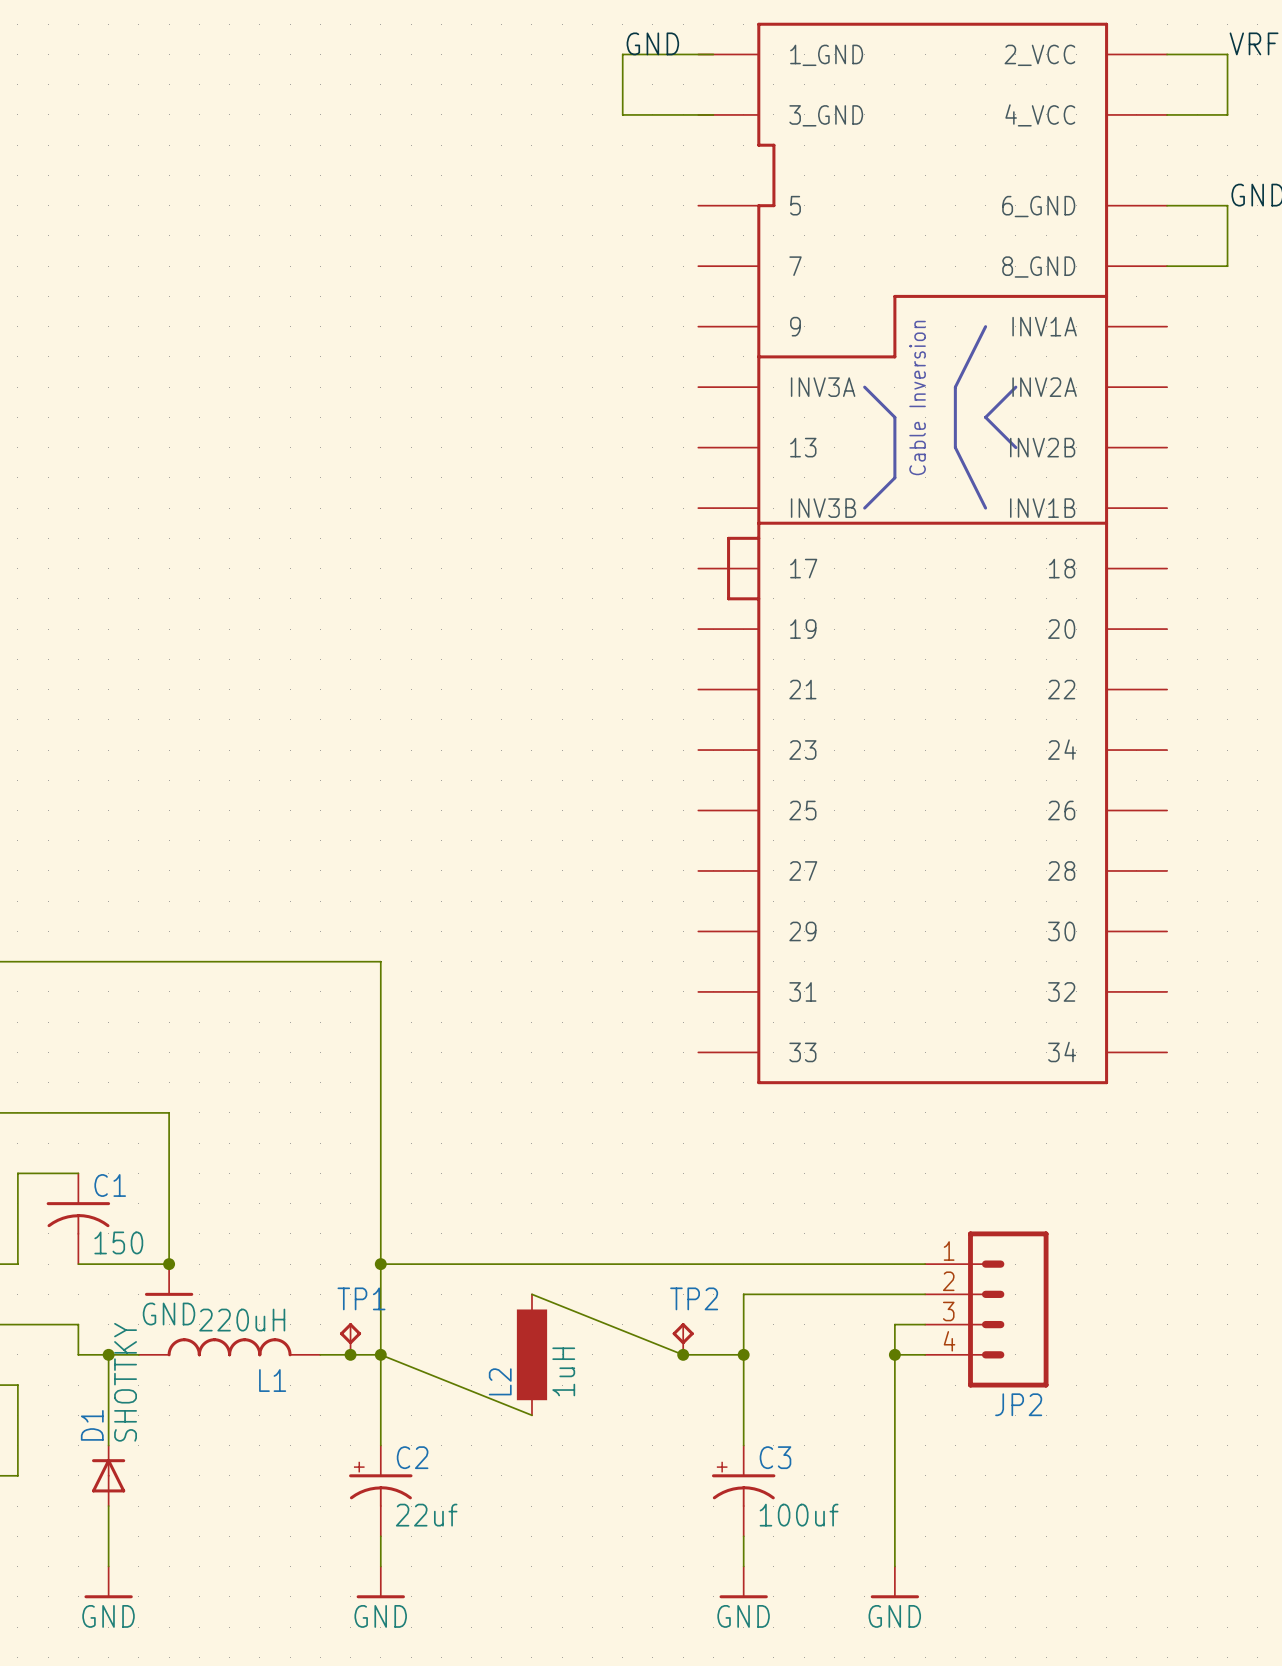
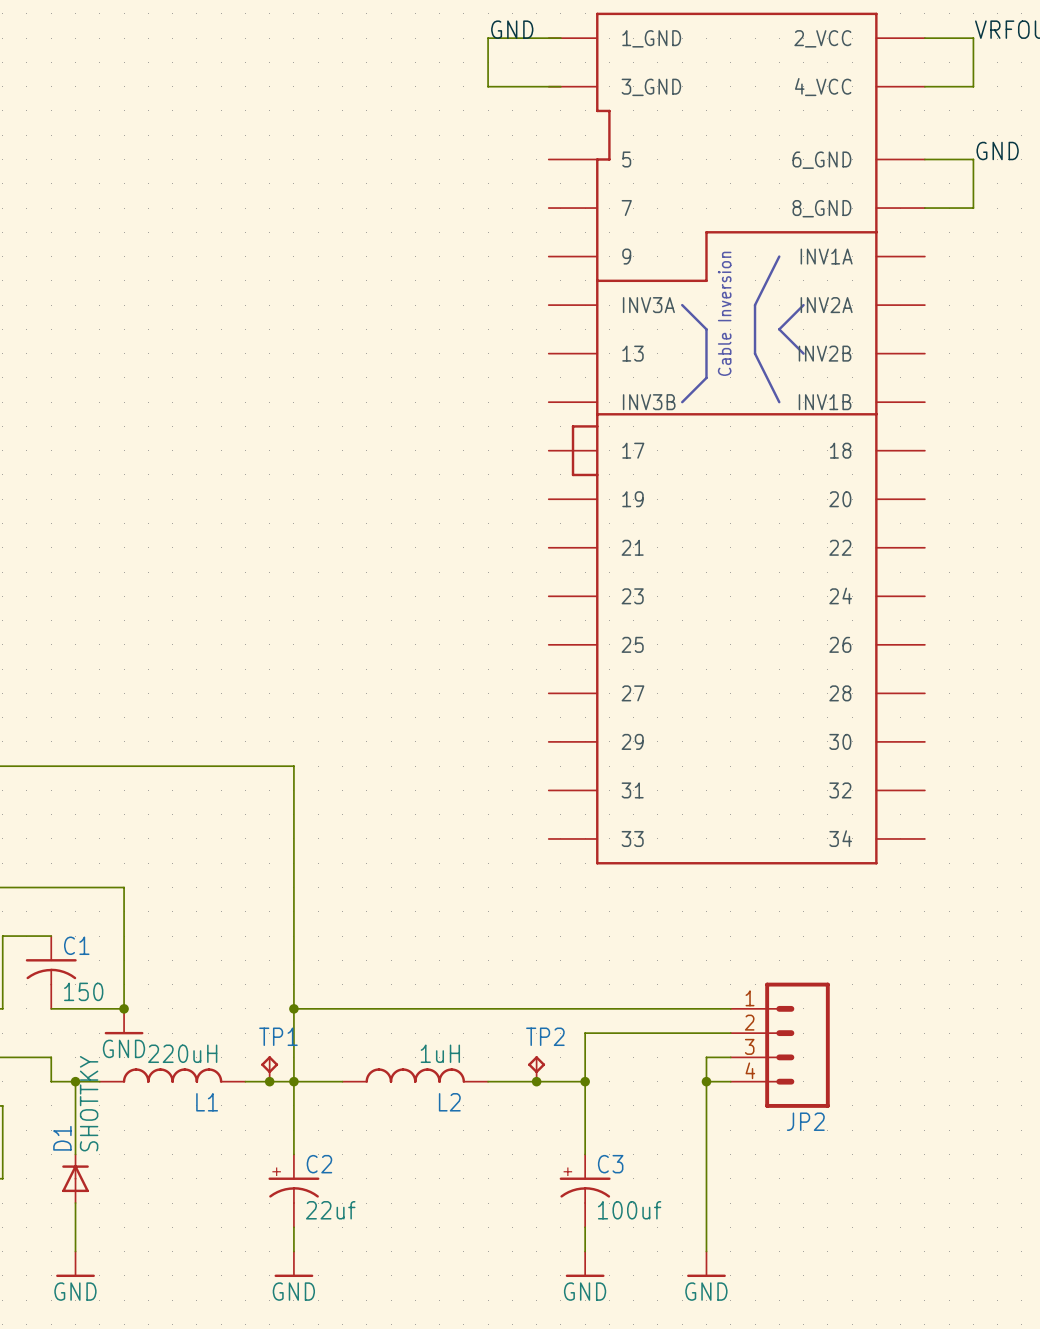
L2 symbol: [516, 1294, 548, 1416] -> [342, 1068, 489, 1083]
wire: (531, 1294) (683, 1354) -> (488, 1081) (536, 1081)
wire: (380, 1354) (531, 1415) -> (293, 1081) (342, 1081)
L2 value position: 1uH (563, 1371) -> 1uH (440, 1053)
L2 name position: L2 (500, 1381) -> L2 (449, 1102)

